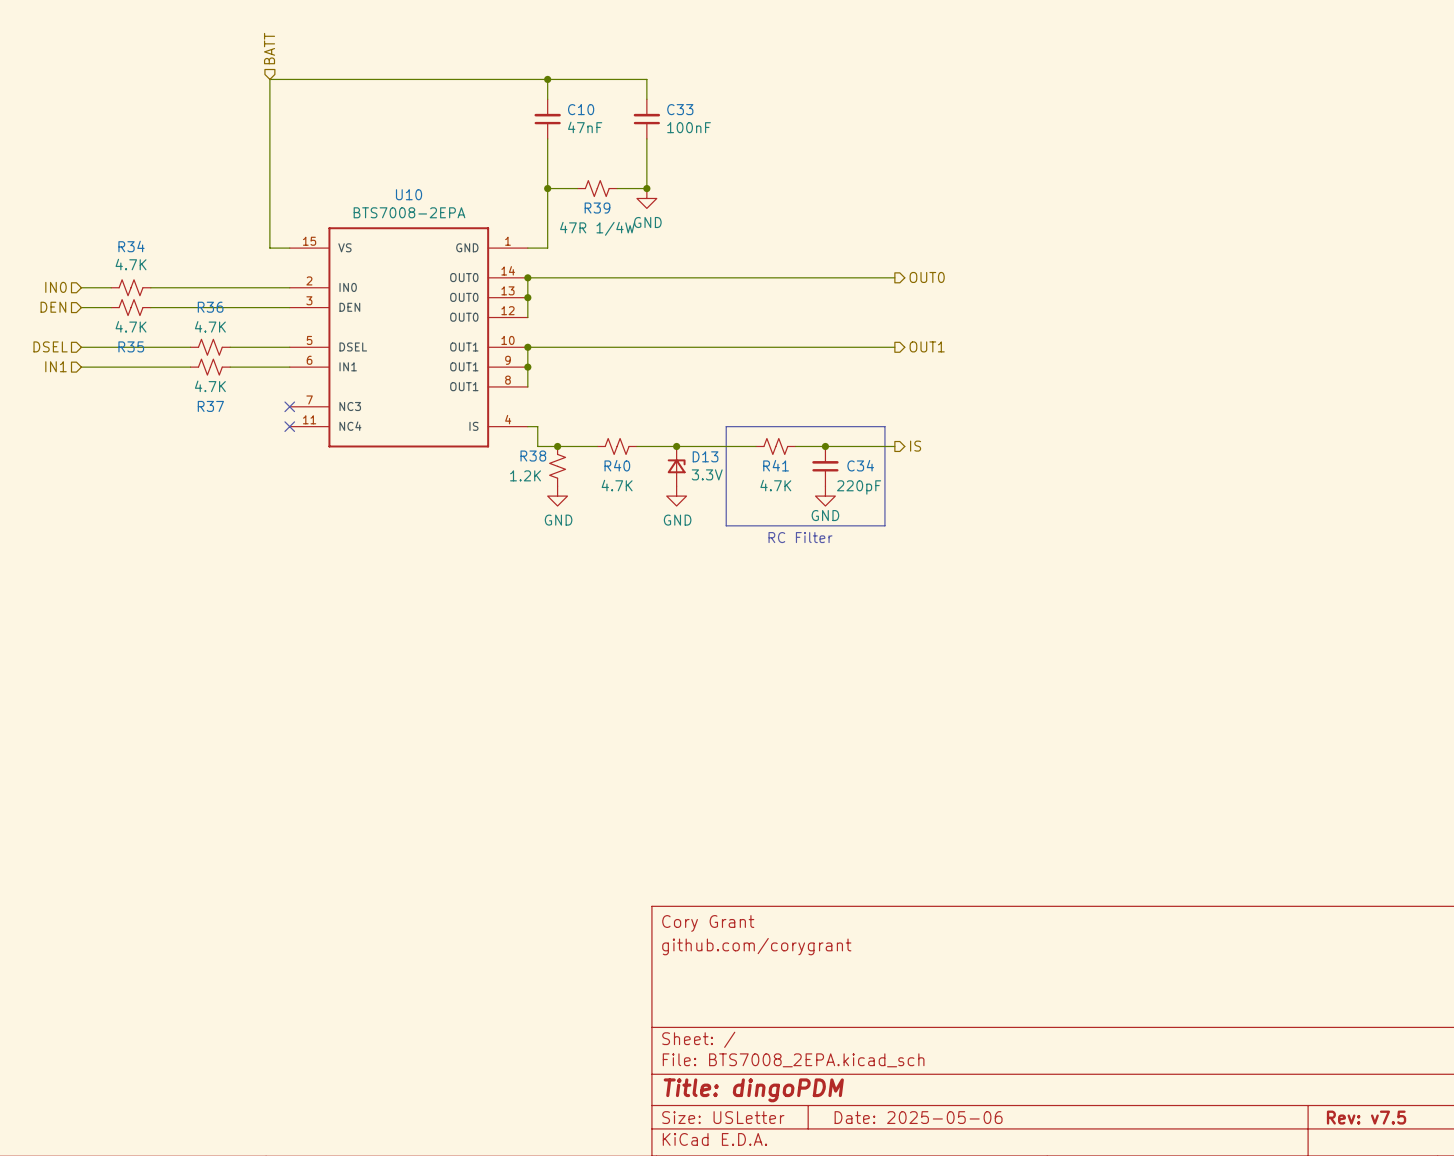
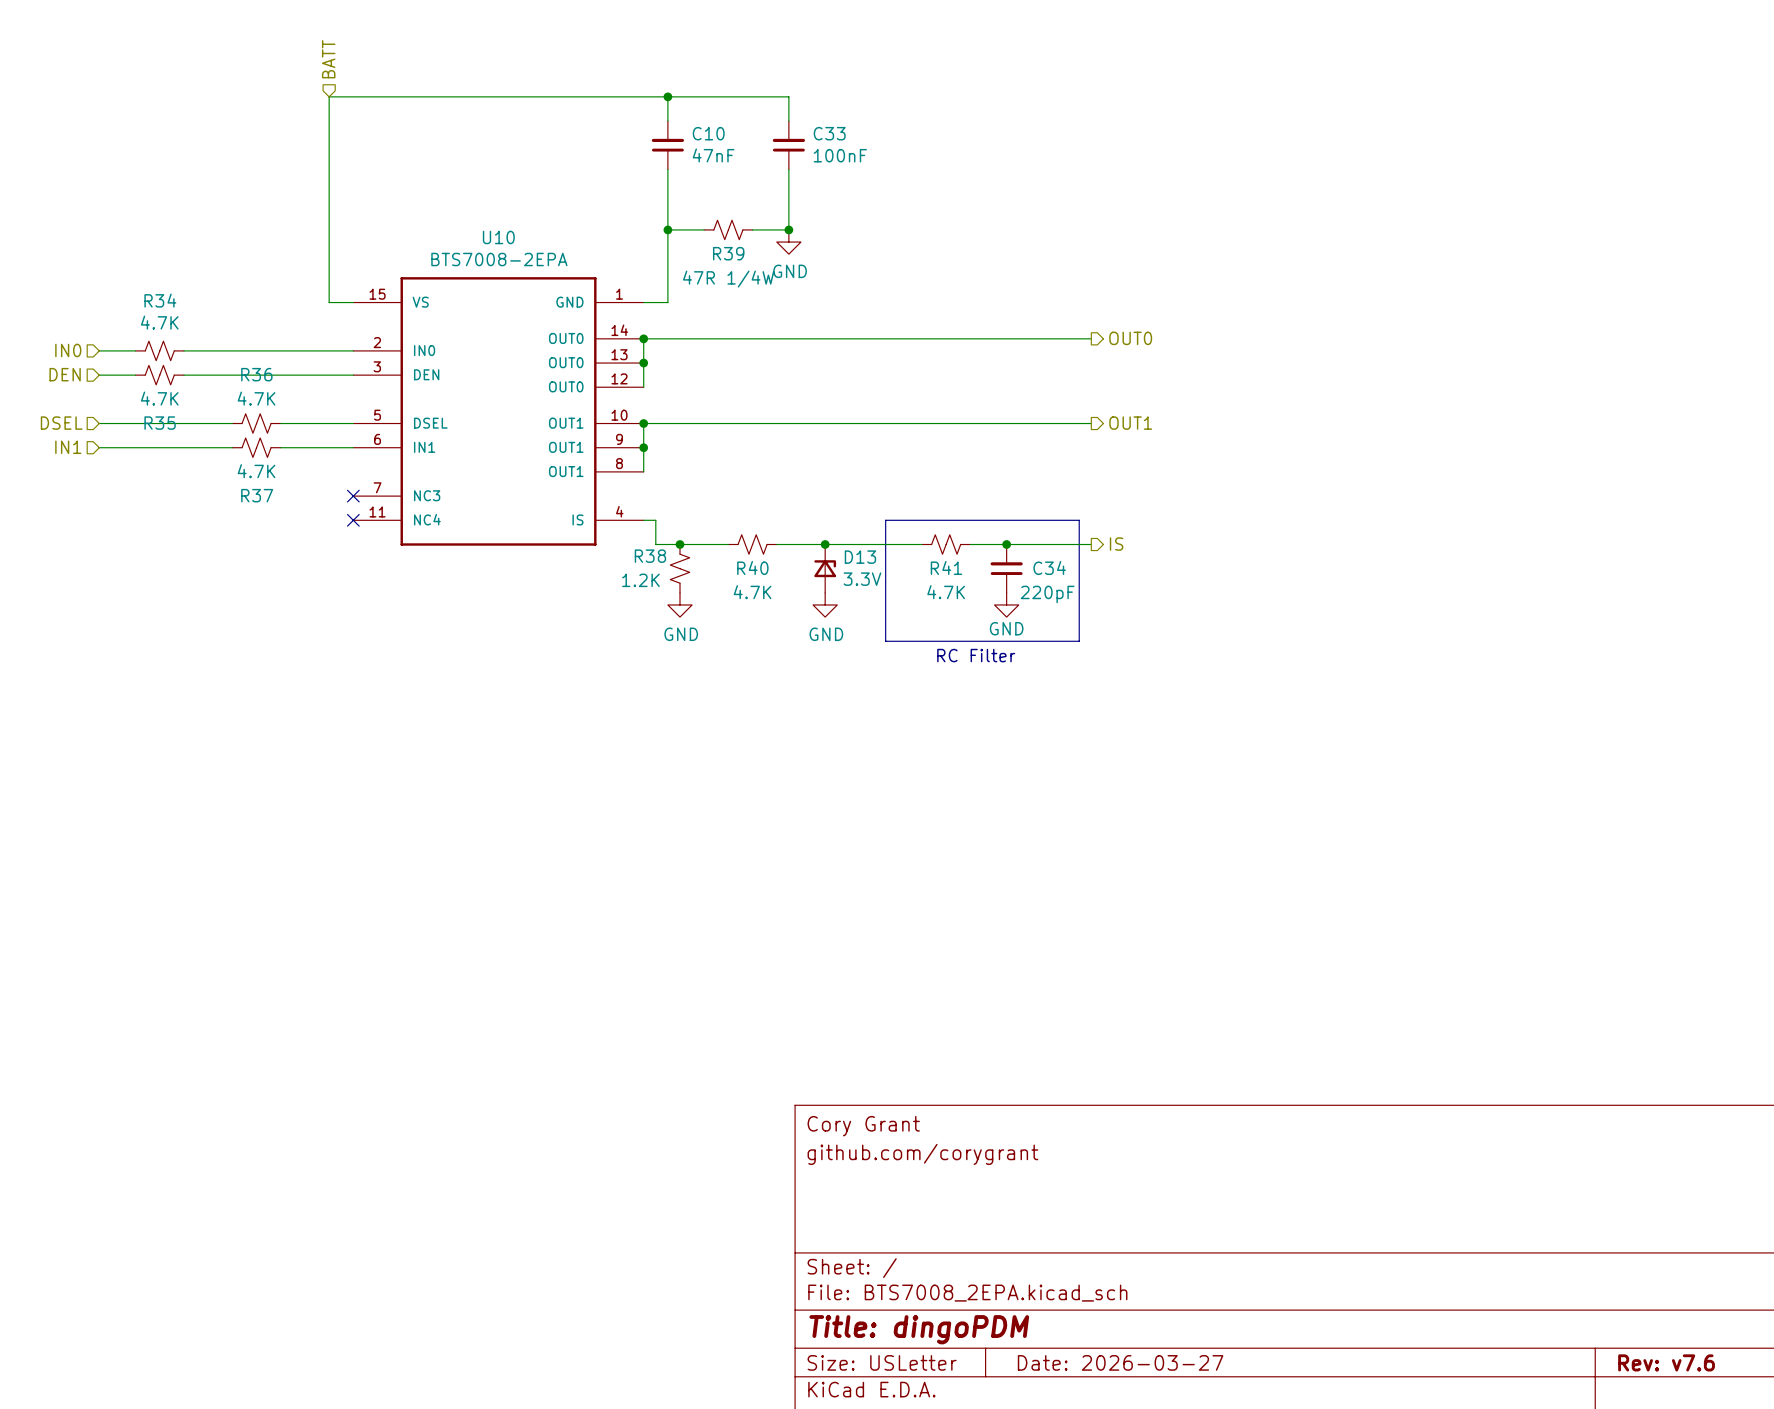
title block: Date: 2025-05-06 (918, 1117) -> Date: 2026-03-27 (1120, 1362)
title block: Rev: v7.5 (1366, 1117) -> Rev: v7.6 (1666, 1362)

